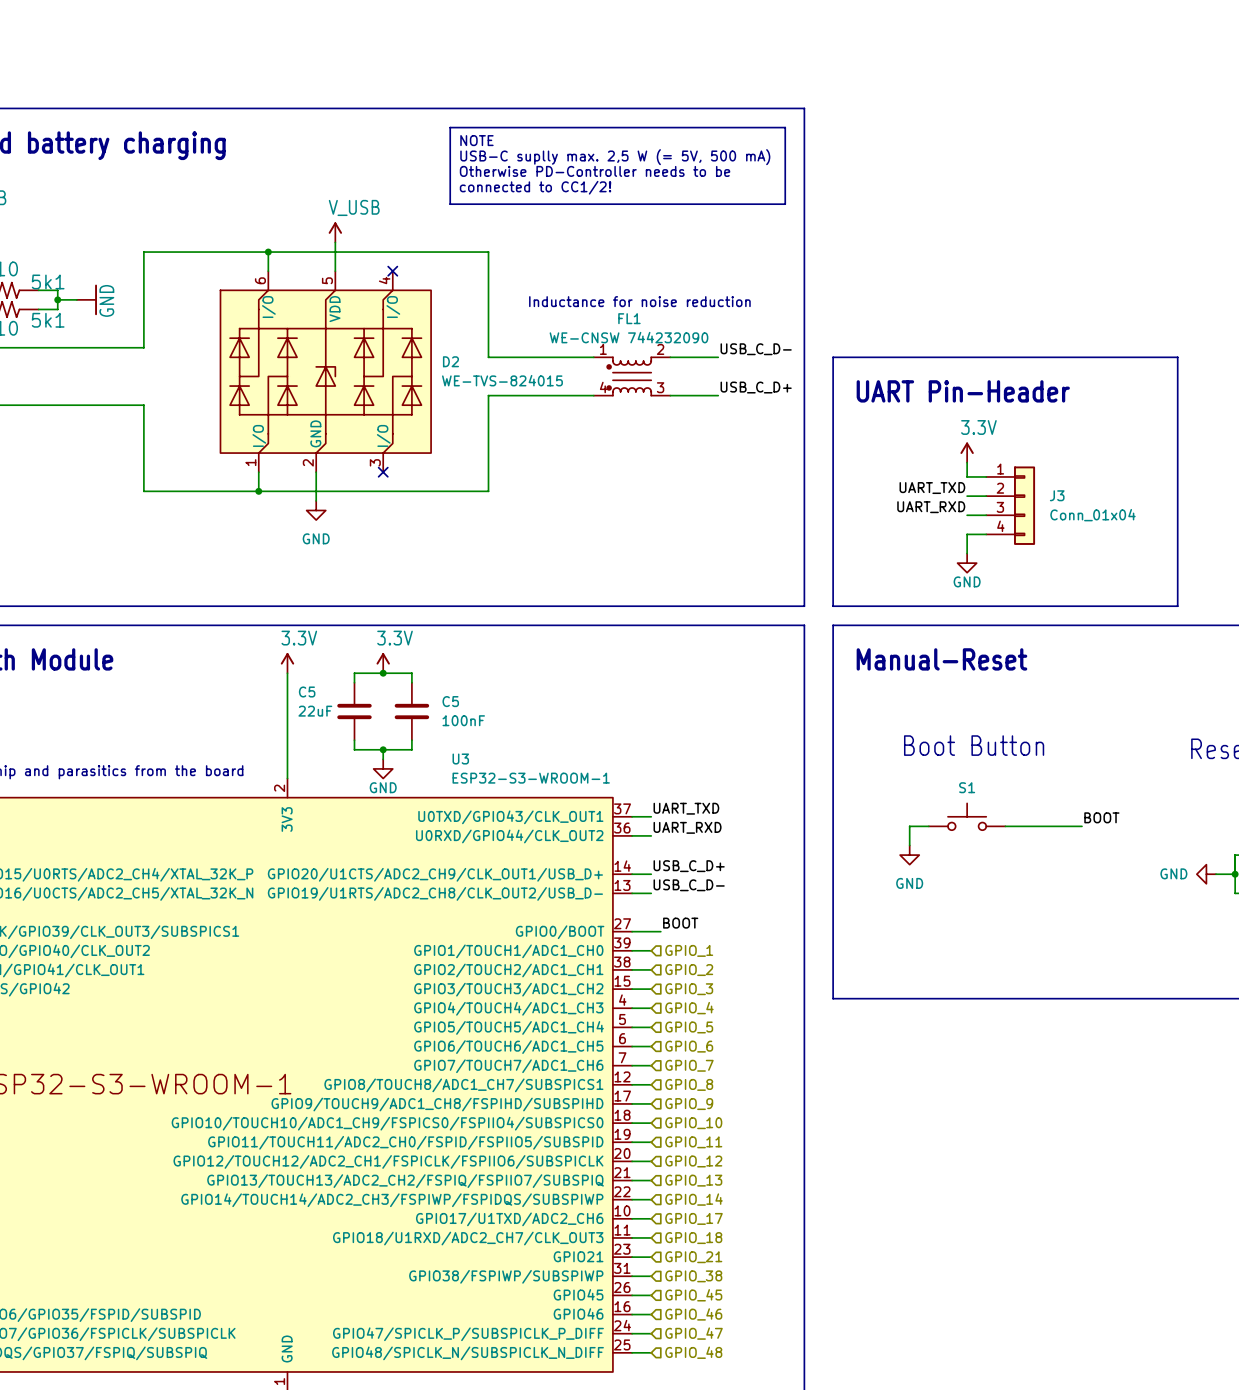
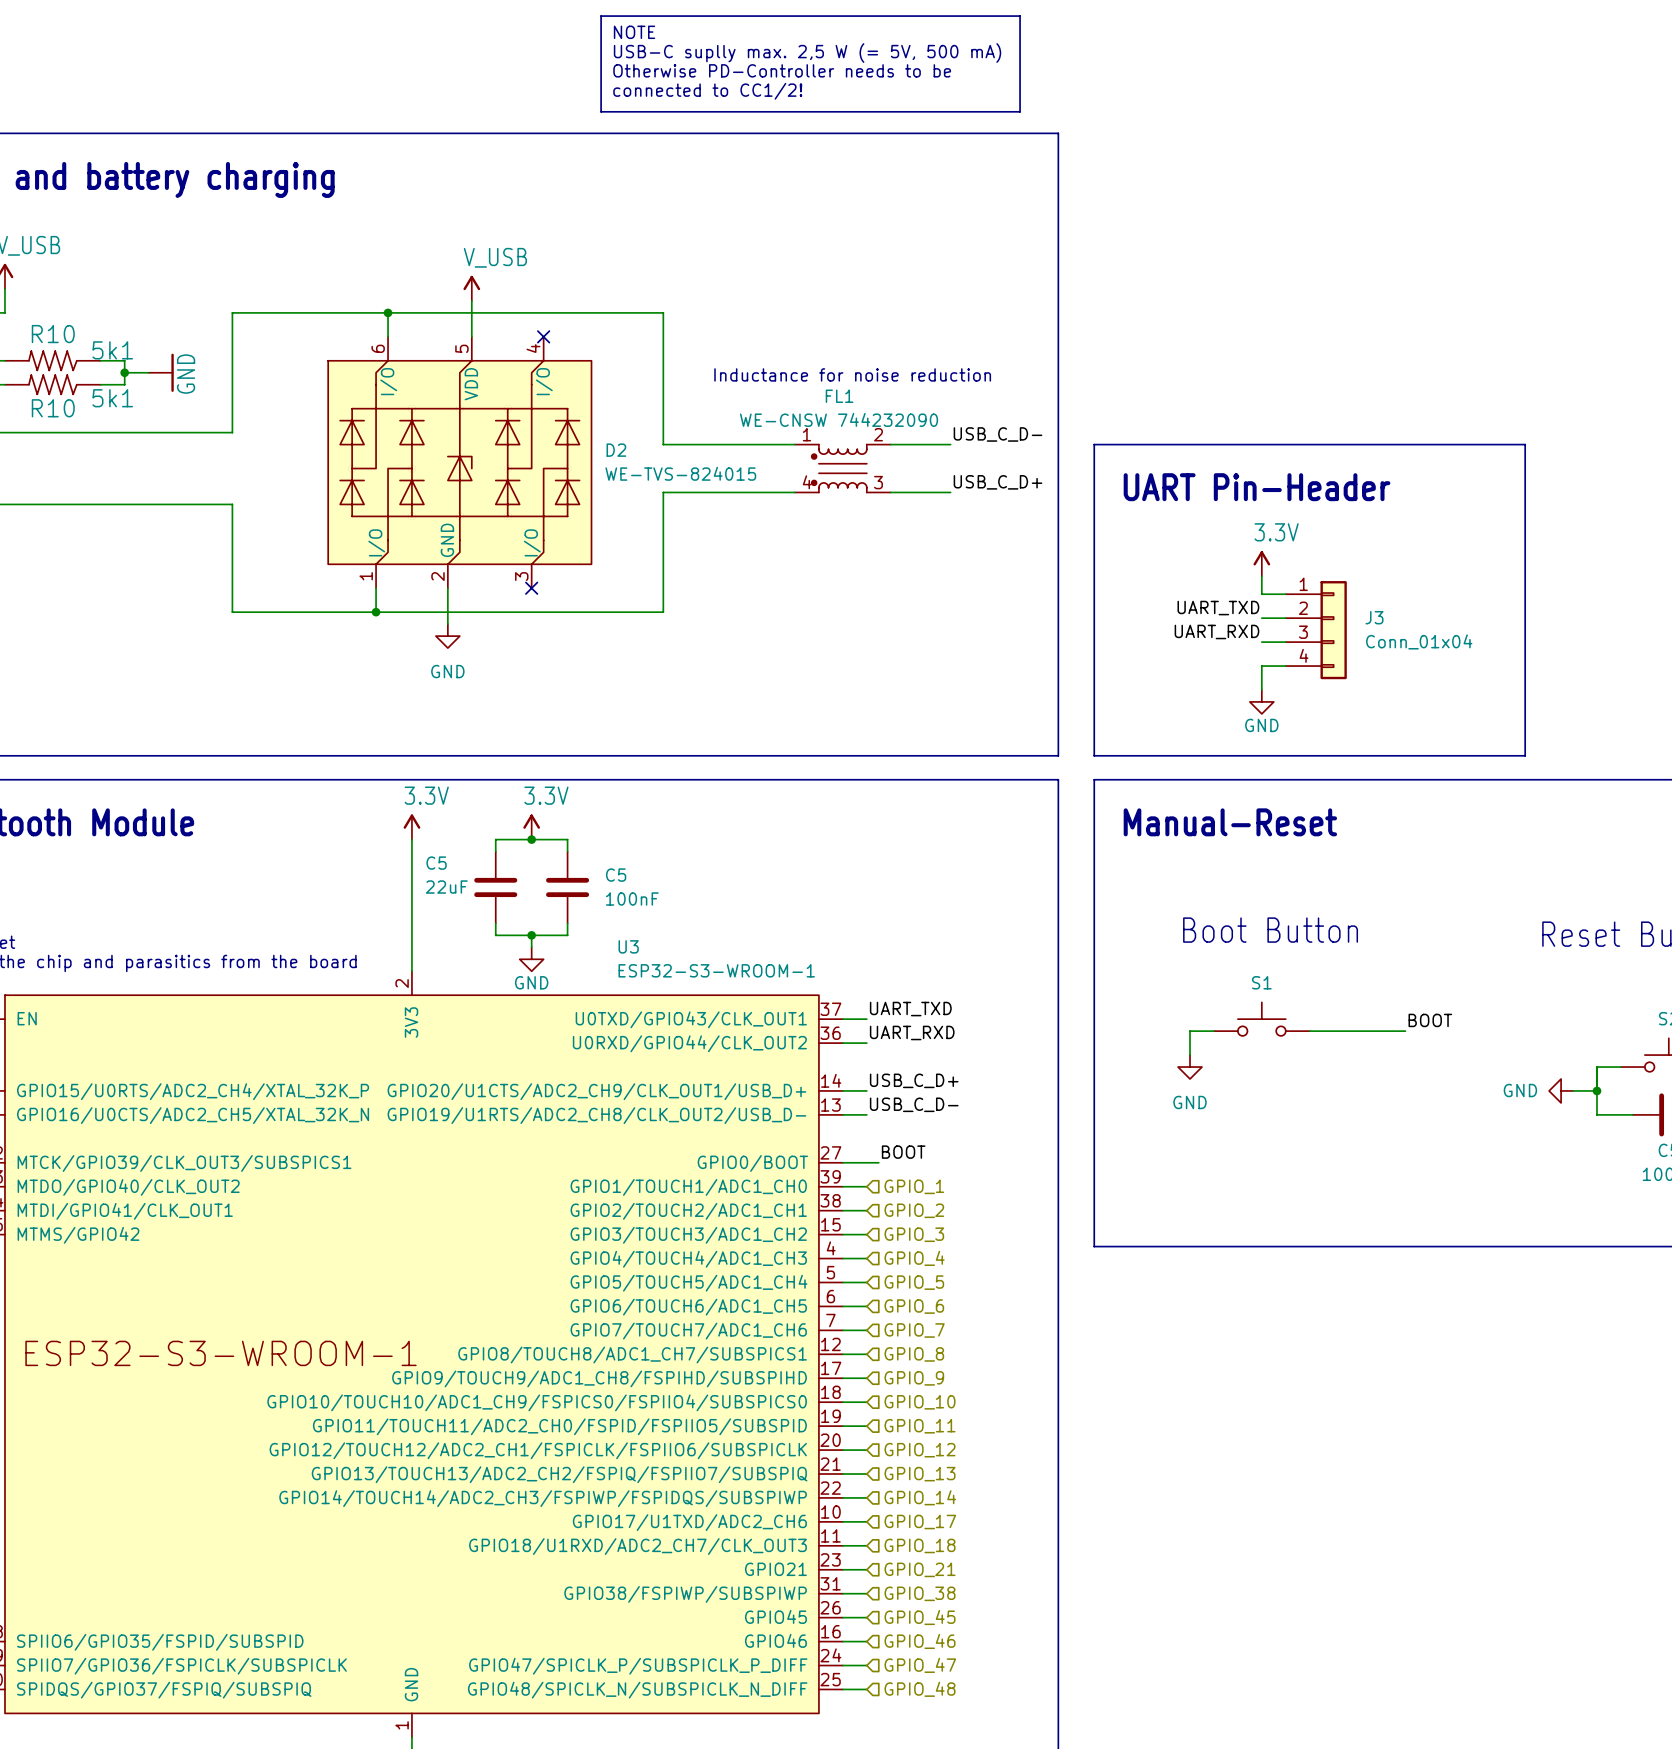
line: (450, 127) (785, 127) (785, 204) (450, 204) (450, 127) -> (601, 16) (1020, 16) (1020, 111) (601, 111) (601, 16)
text position: NOTE (476, 140) -> NOTE (634, 32)
text position: USB-C suplly max. 2,5 W (= 5V, 500 mA) (615, 157) -> USB-C suplly max. 2,5 W (= 5V, 500 mA) (807, 53)
text position: Otherwise PD-Controller needs to be (595, 171) -> Otherwise PD-Controller needs to be (782, 70)
text position: connected to CC1/2! (535, 187) -> connected to CC1/2! (707, 91)

